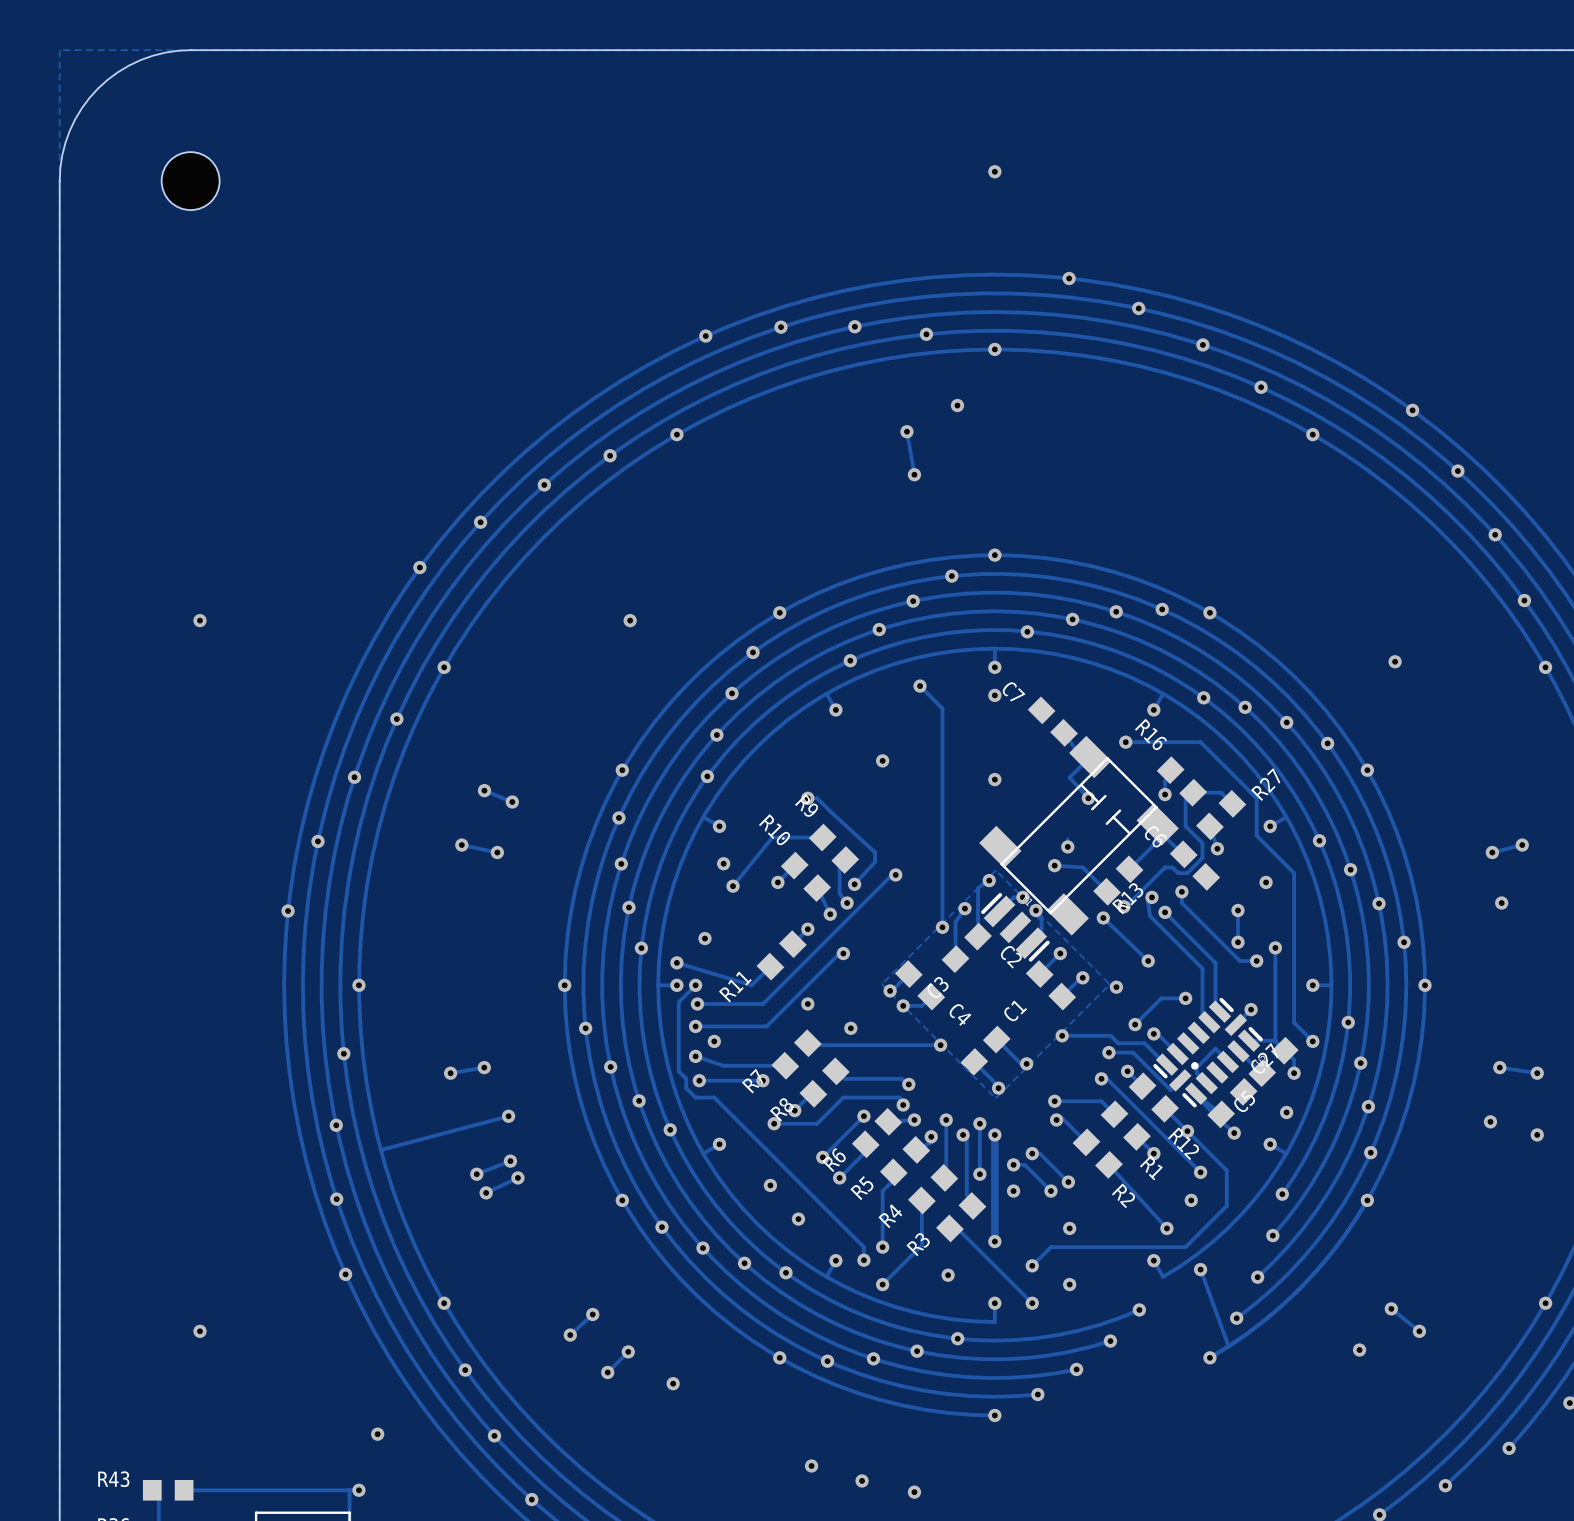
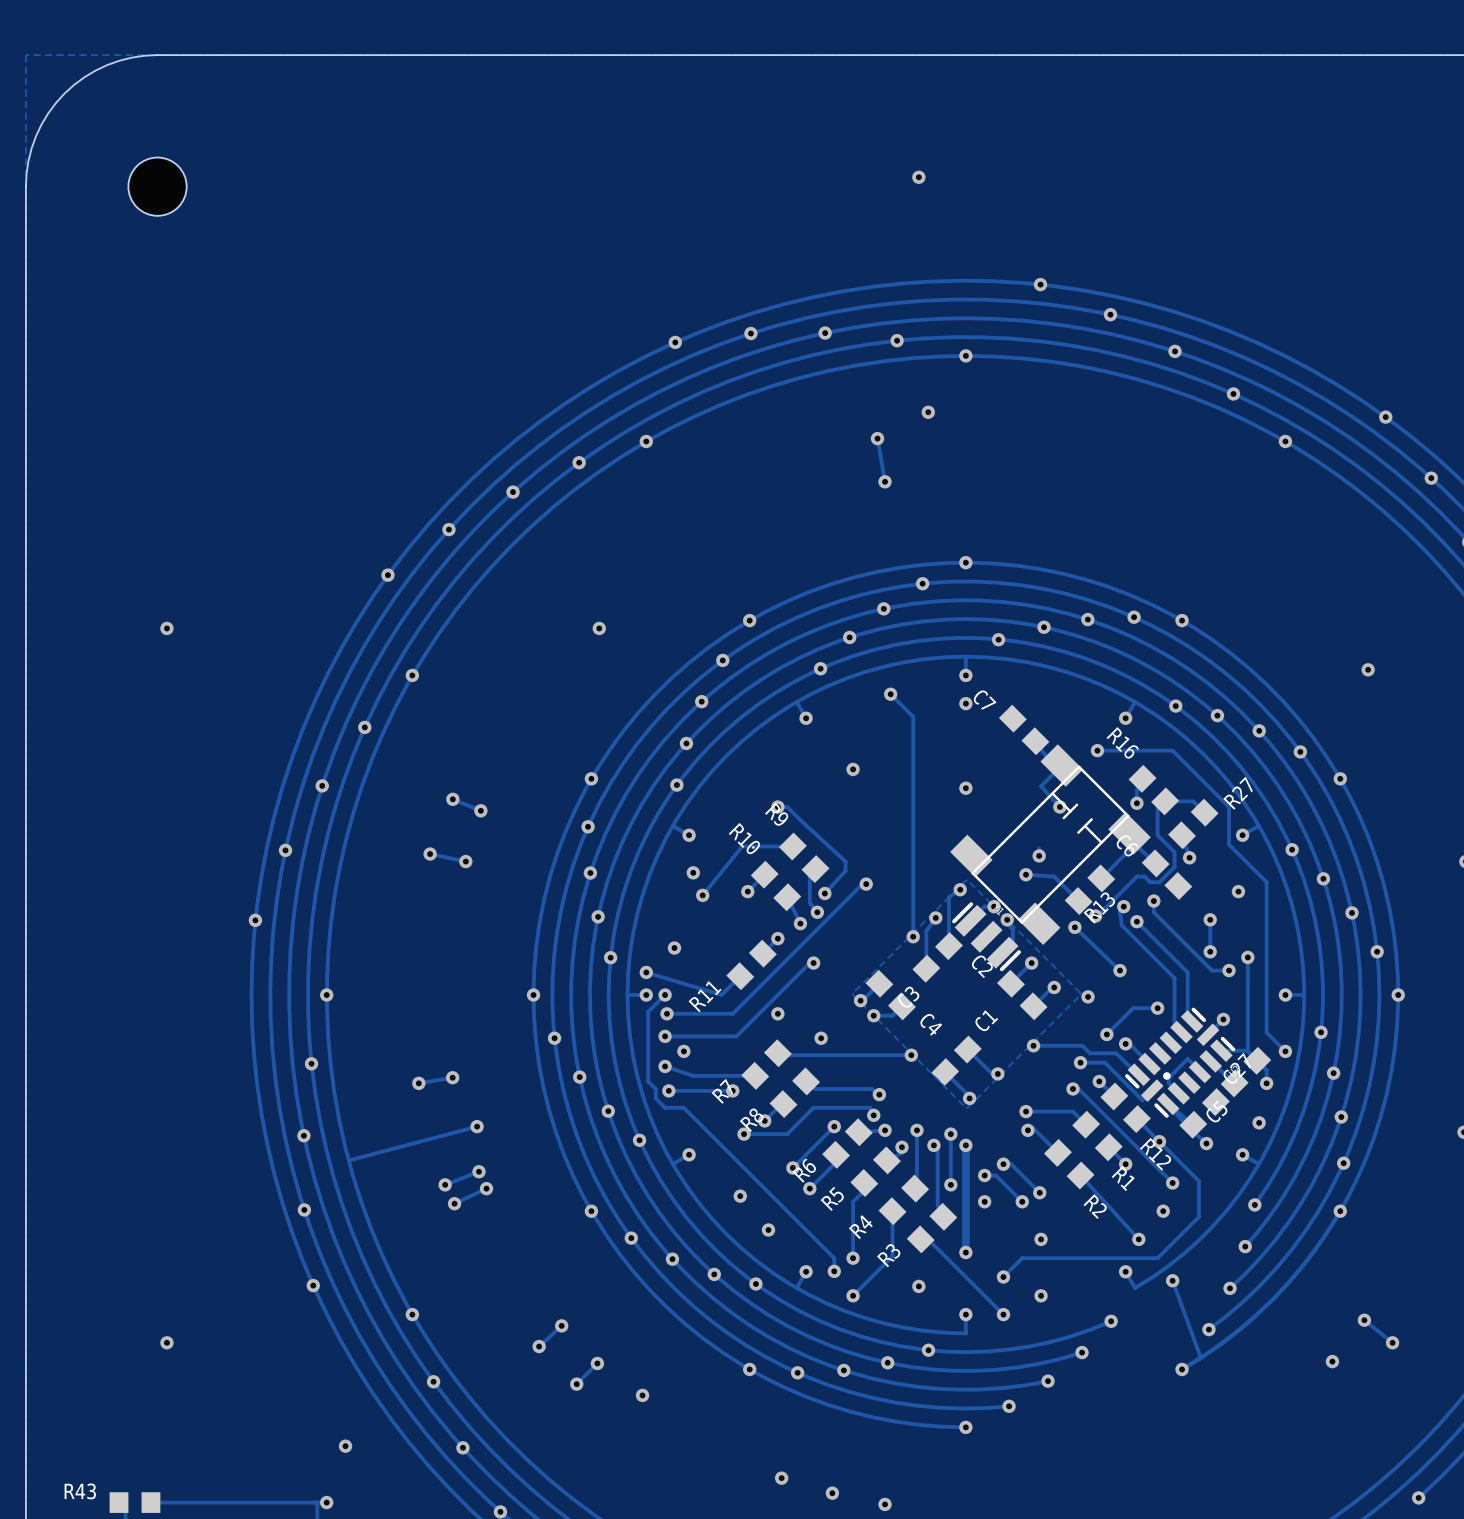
via position: (994, 171) -> (918, 177)

